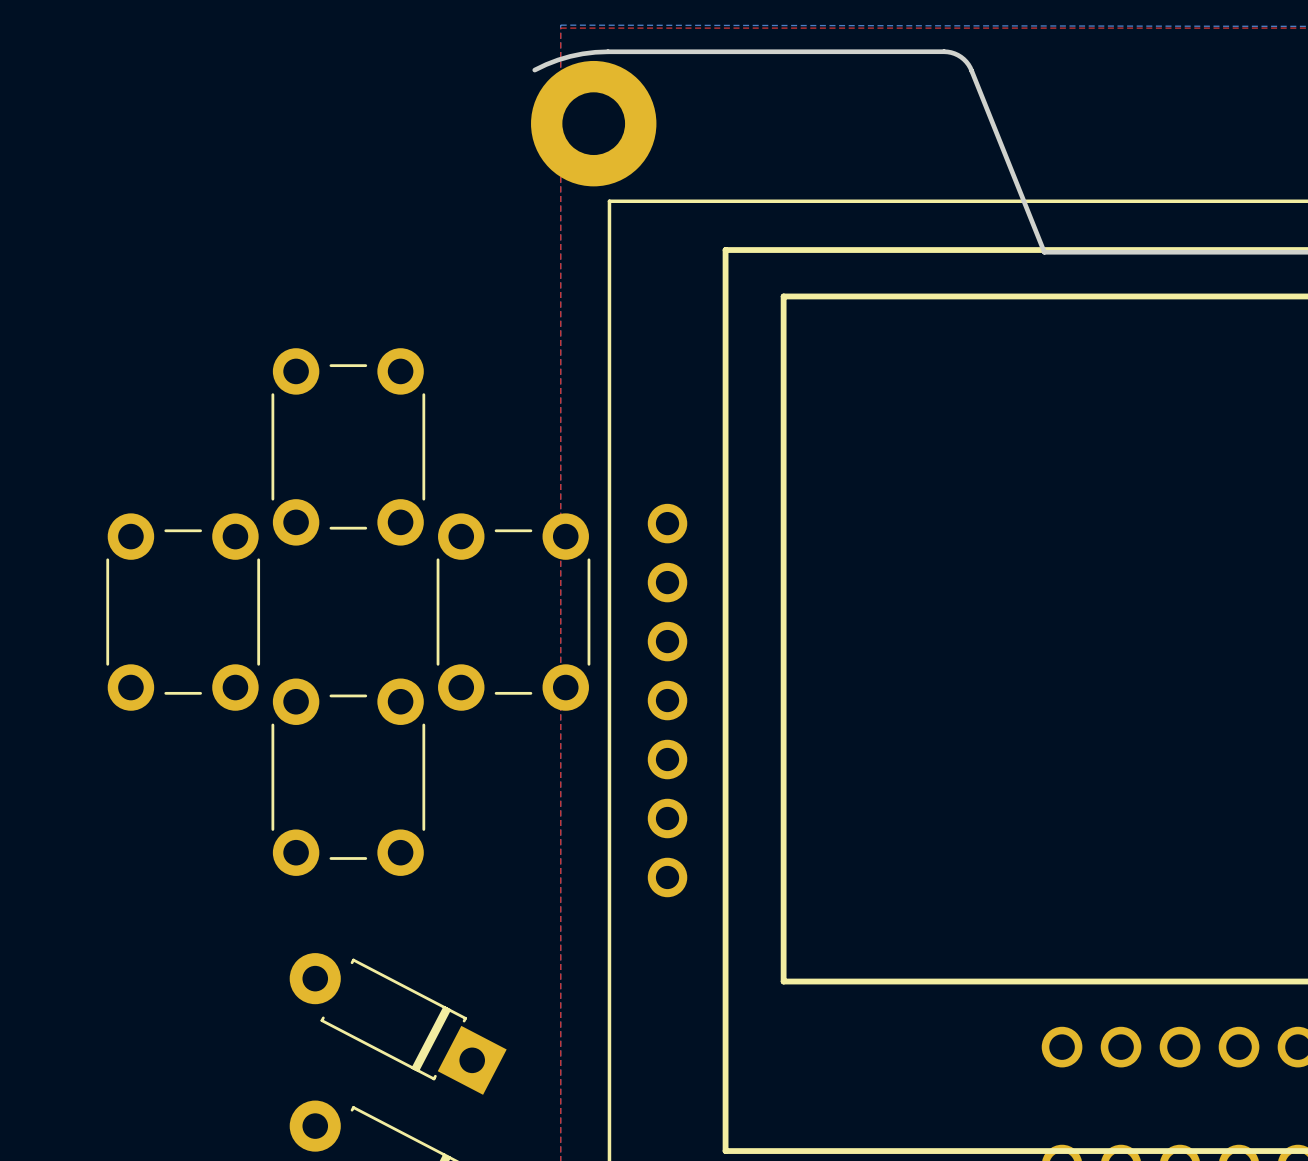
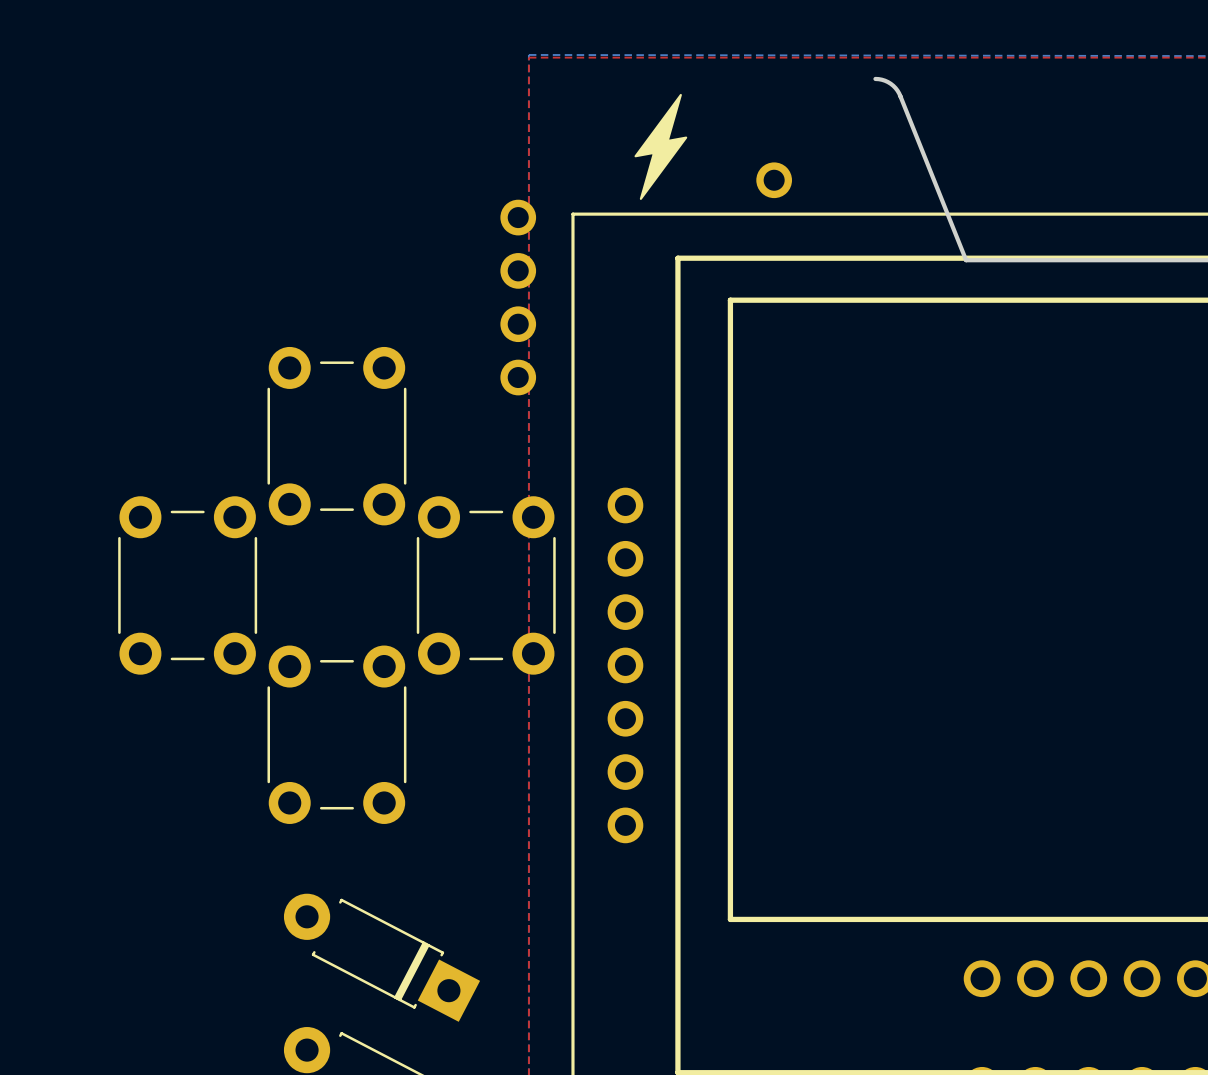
board edge: (944, 51) (595, 52) (570, 56) (534, 70) -> none
drawing: none -> [634, 93, 688, 200]
part: (593, 123) -> none
part: none -> (774, 180)
part: none -> (518, 297)

